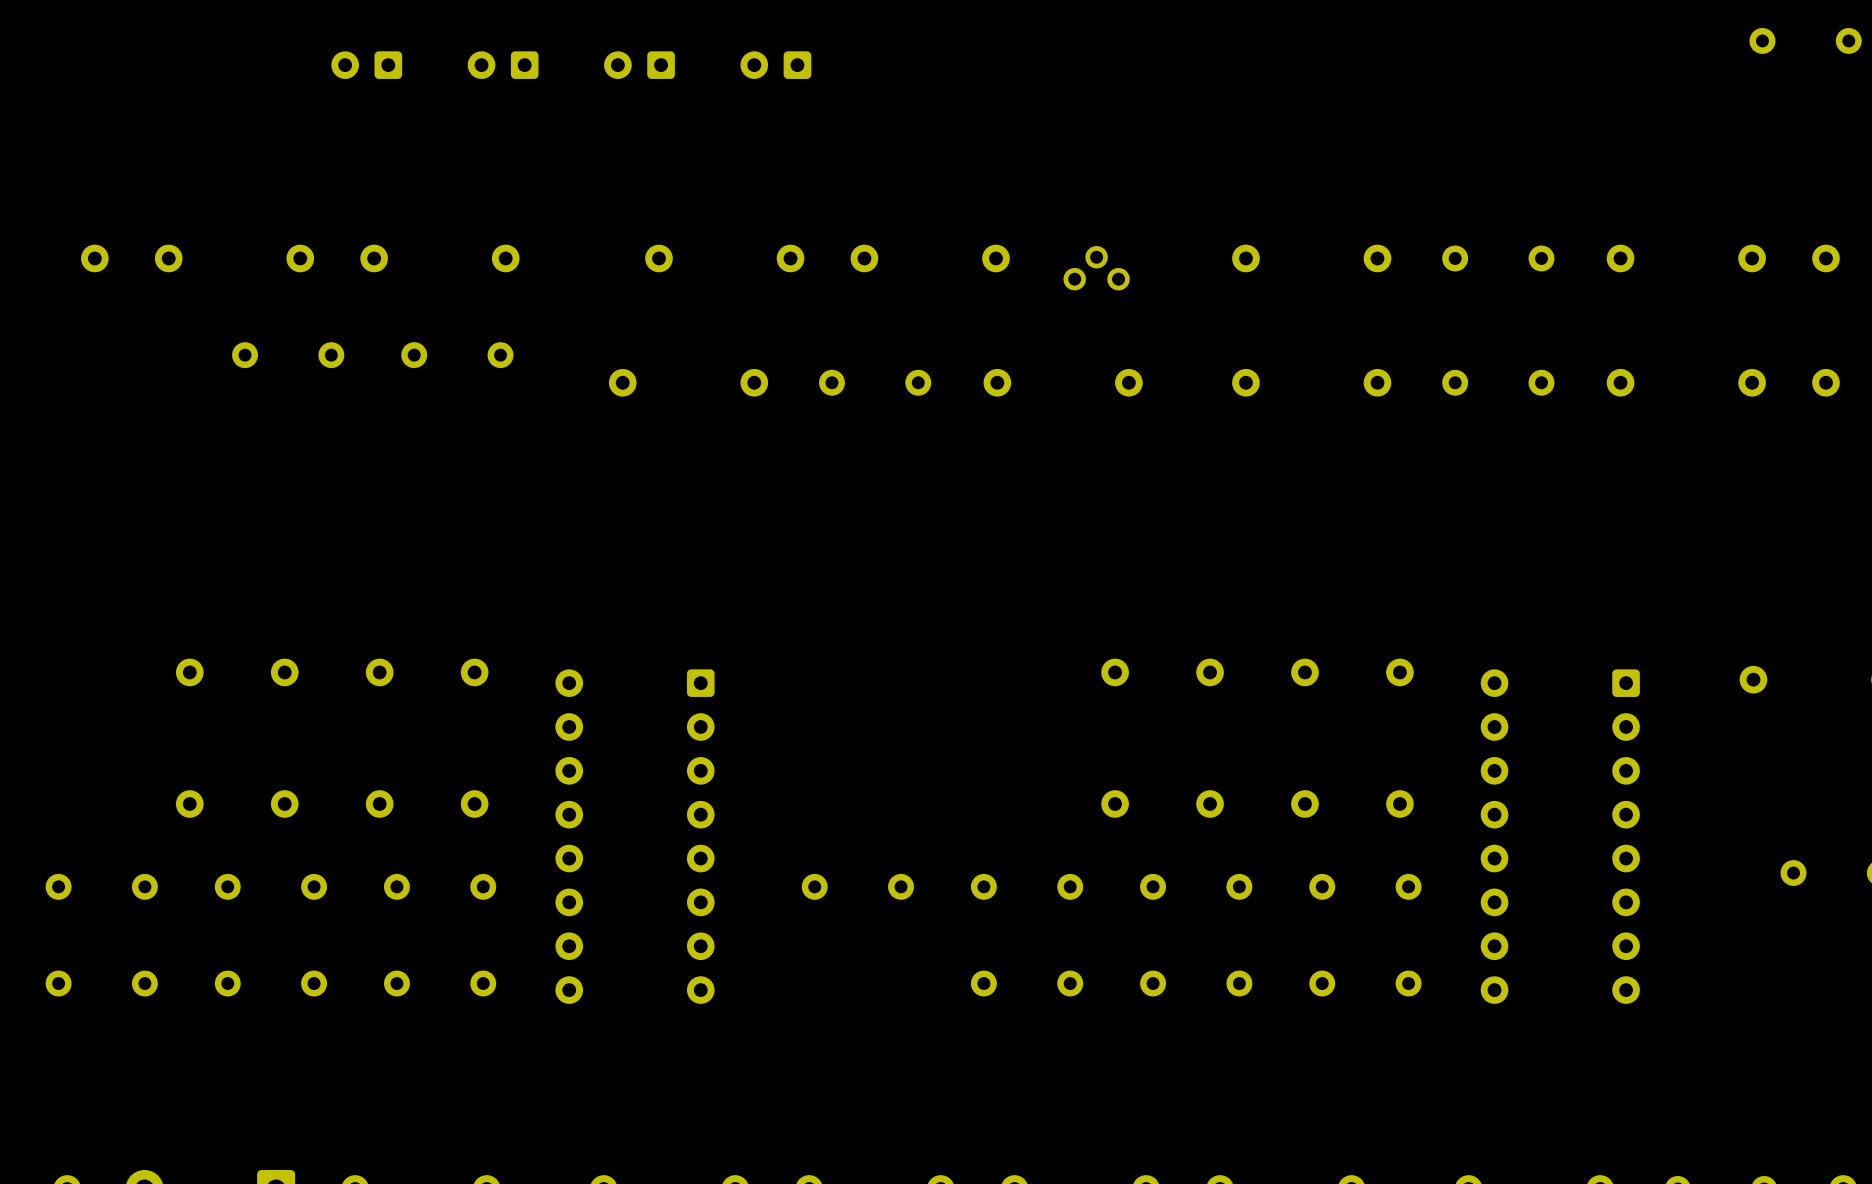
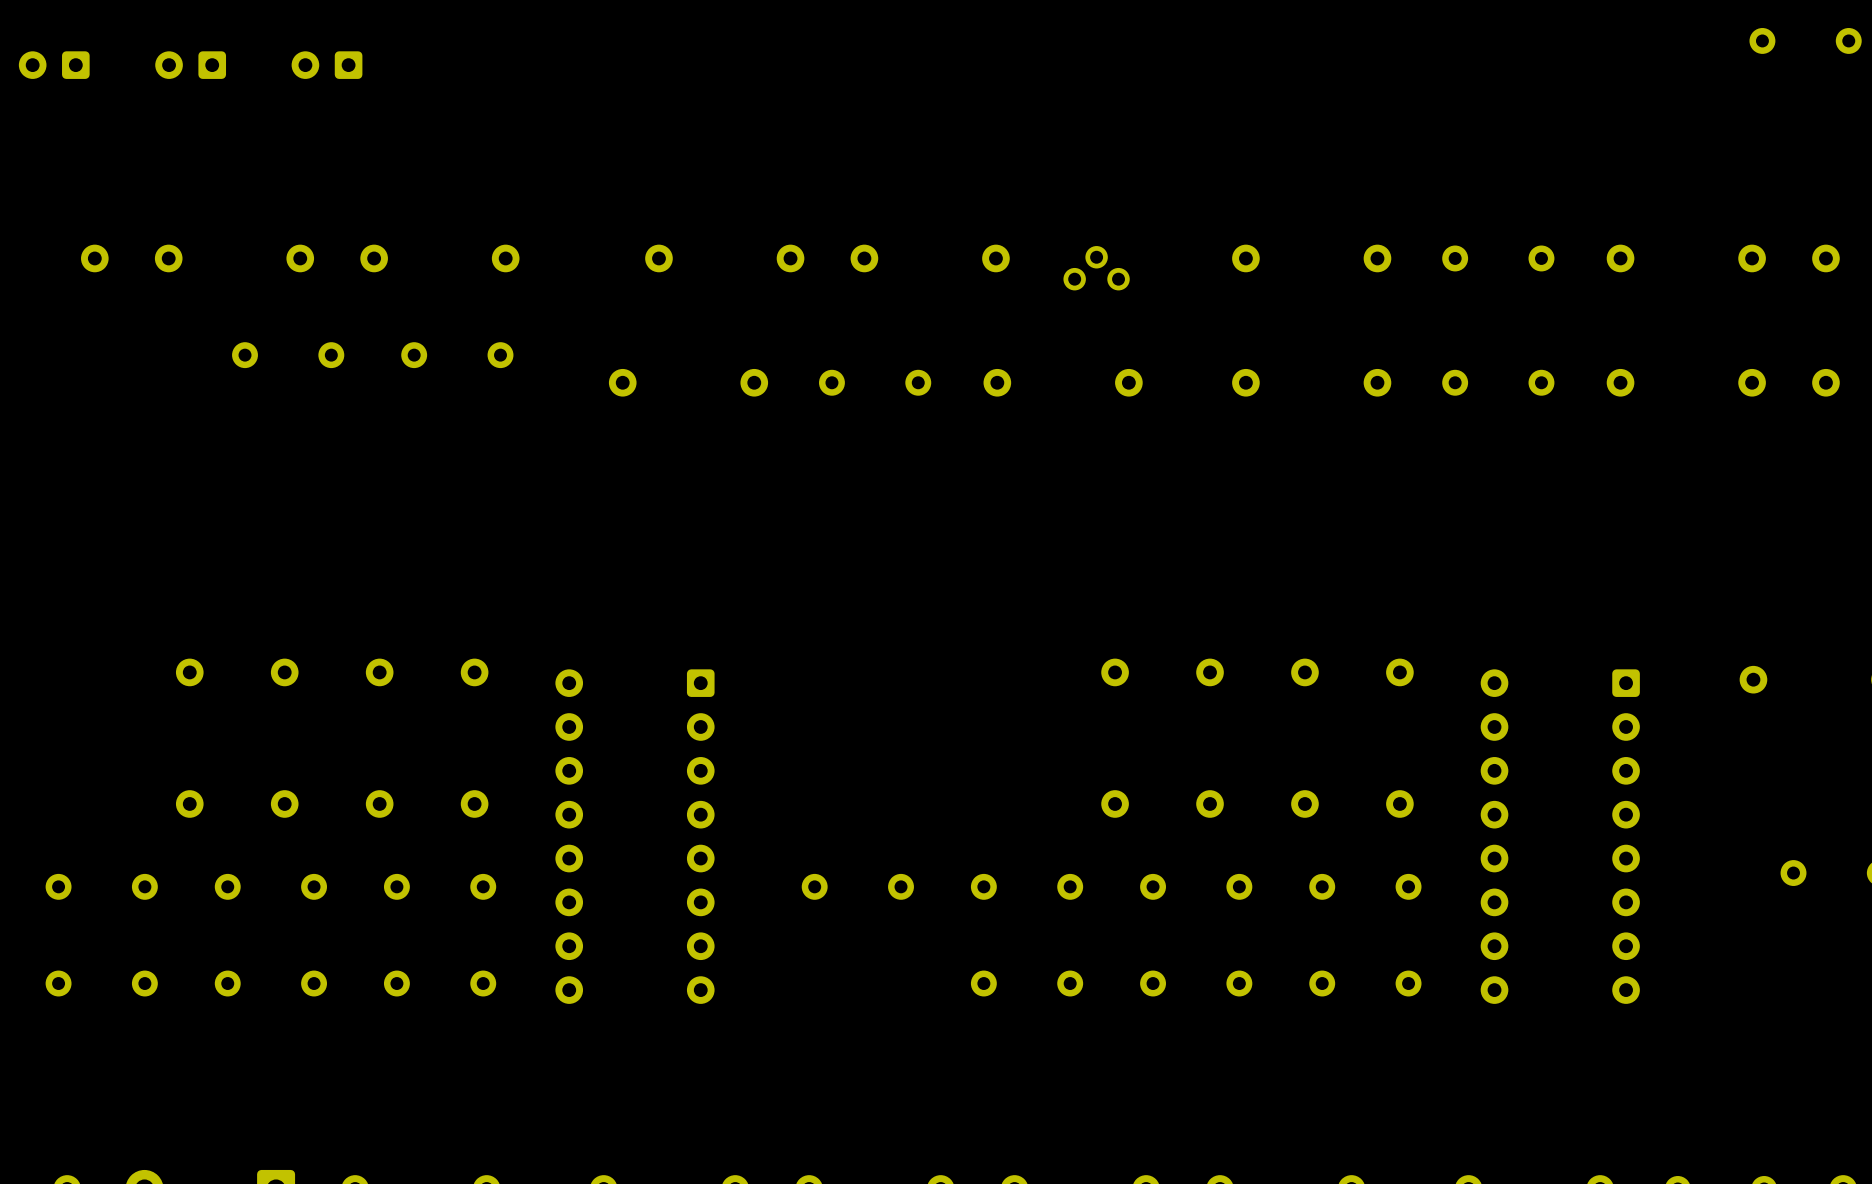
part: none -> (54, 65)
part: none -> (190, 65)
part position: (366, 65) -> (327, 65)
part: (503, 65) -> none
part: (639, 65) -> none
part: (775, 65) -> none

